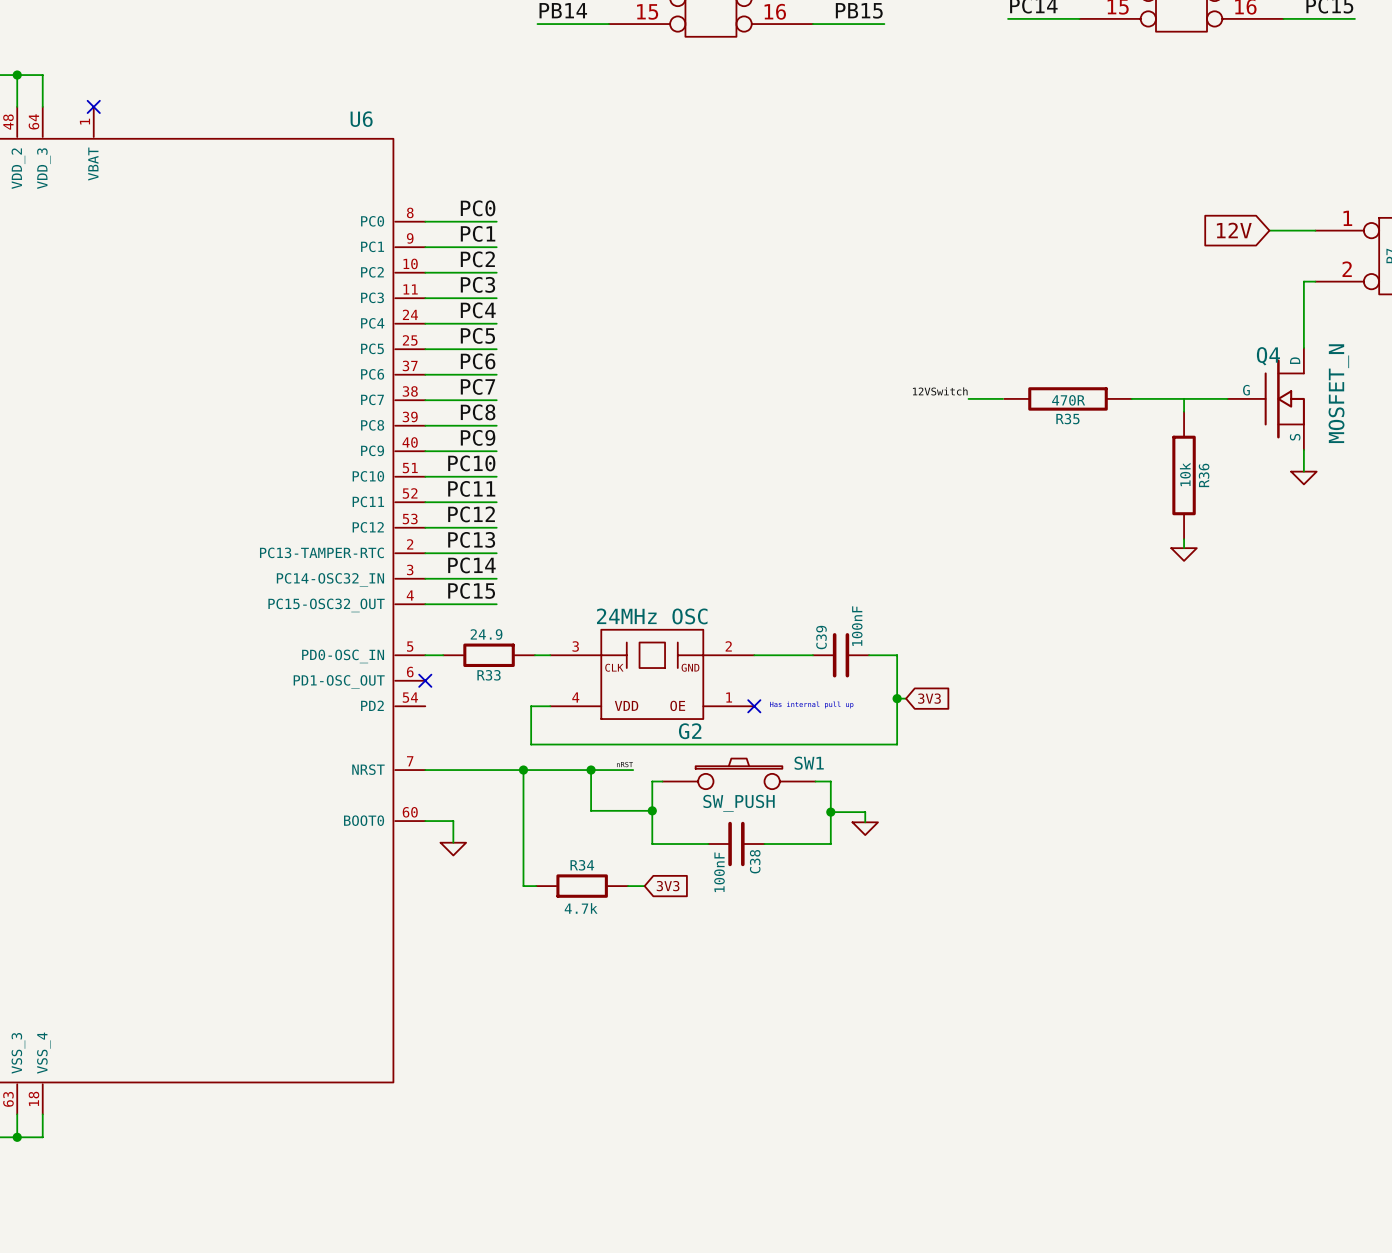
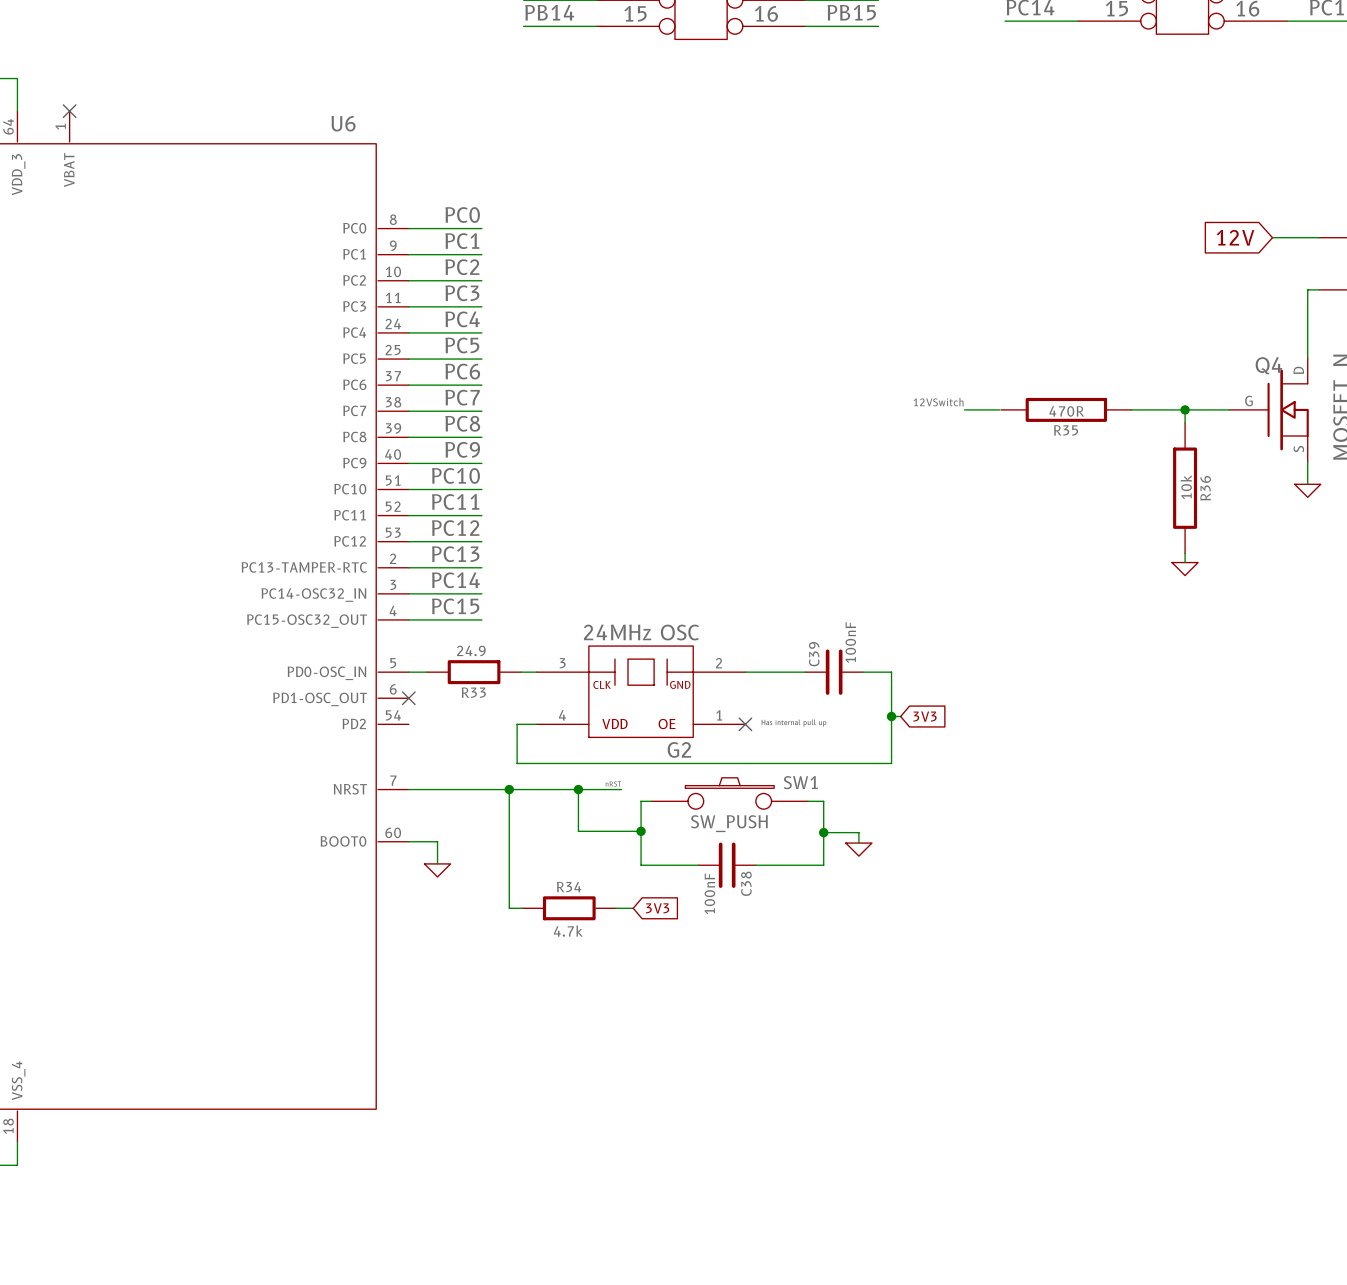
junction: none -> (1185, 409)

